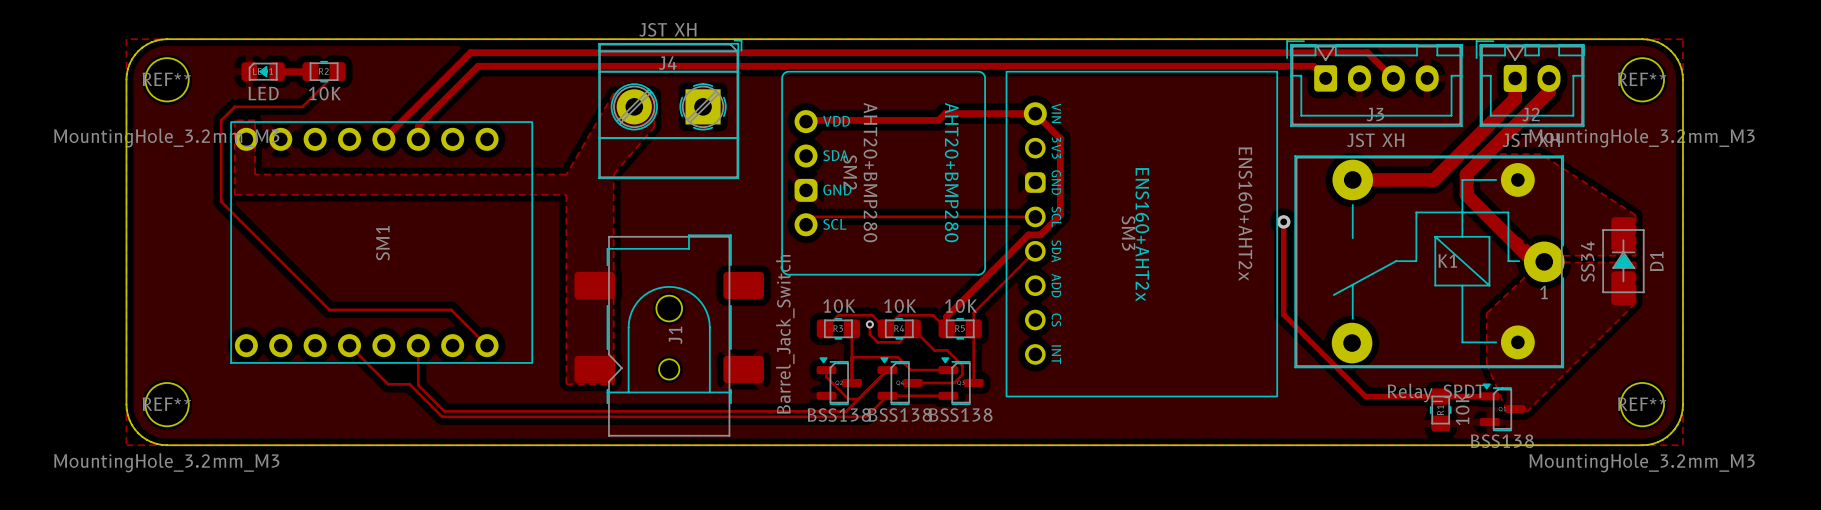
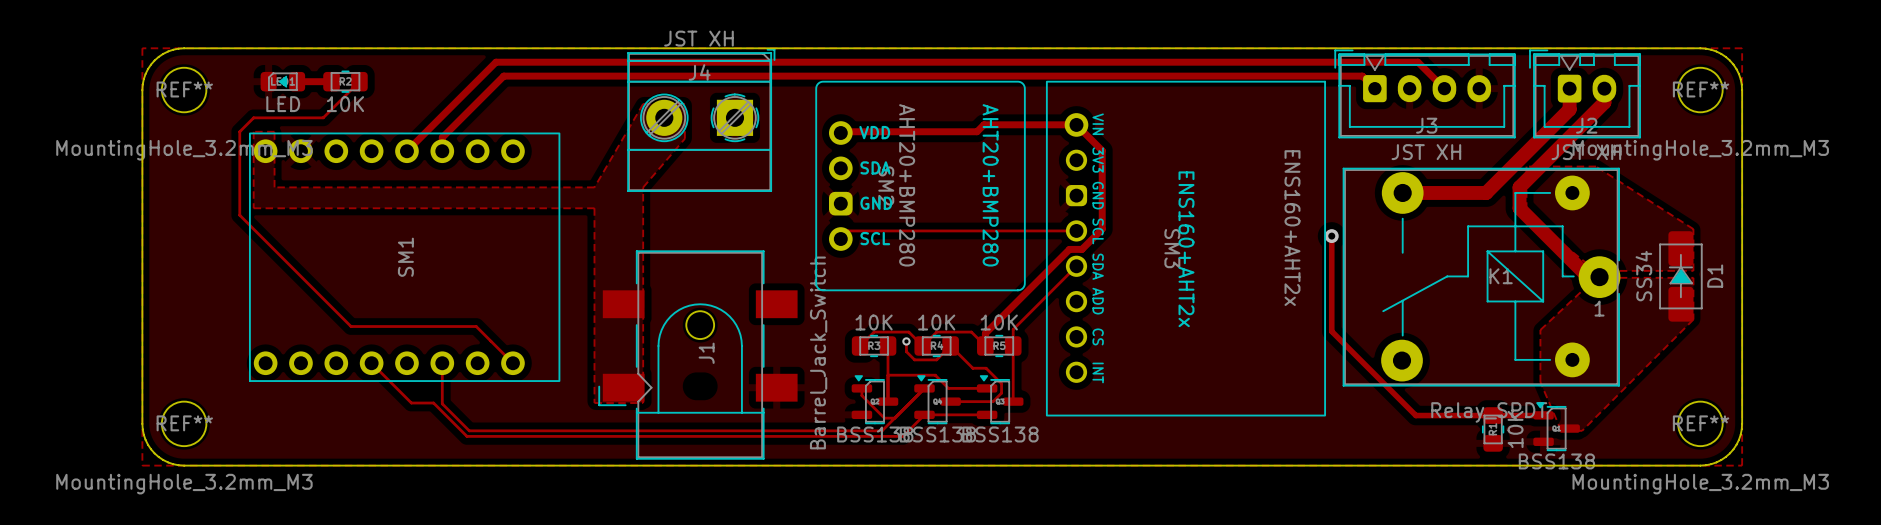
J1 footprint: [574, 234, 764, 437] -> [598, 250, 798, 460]

